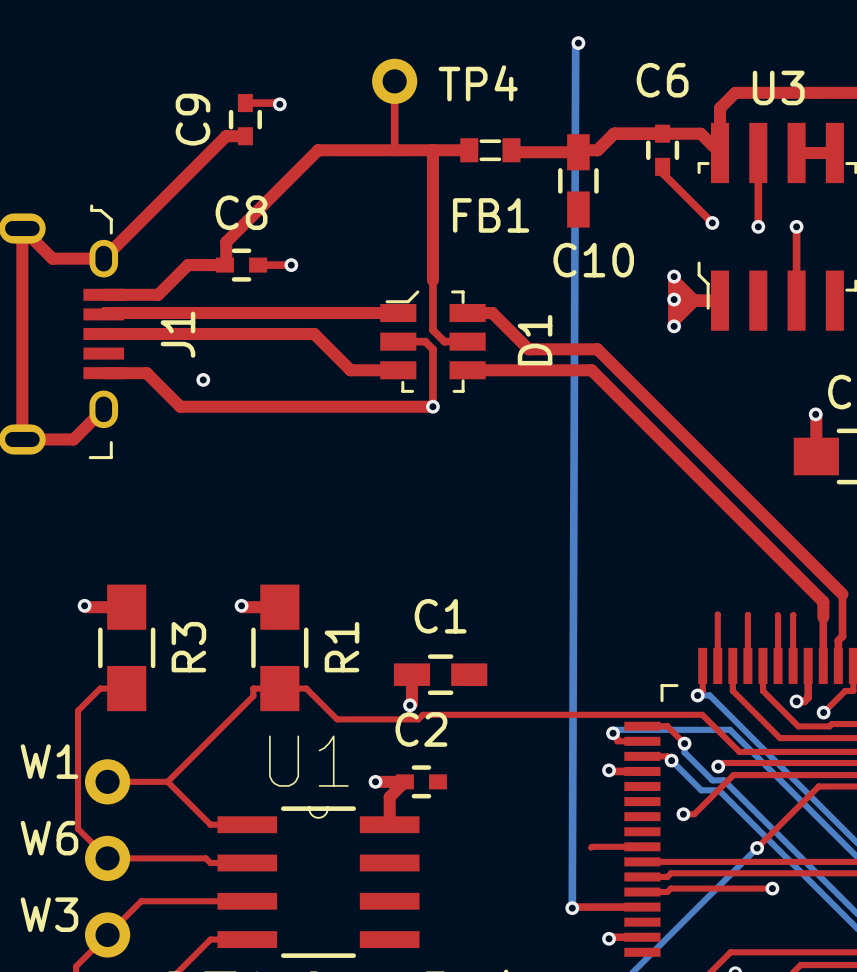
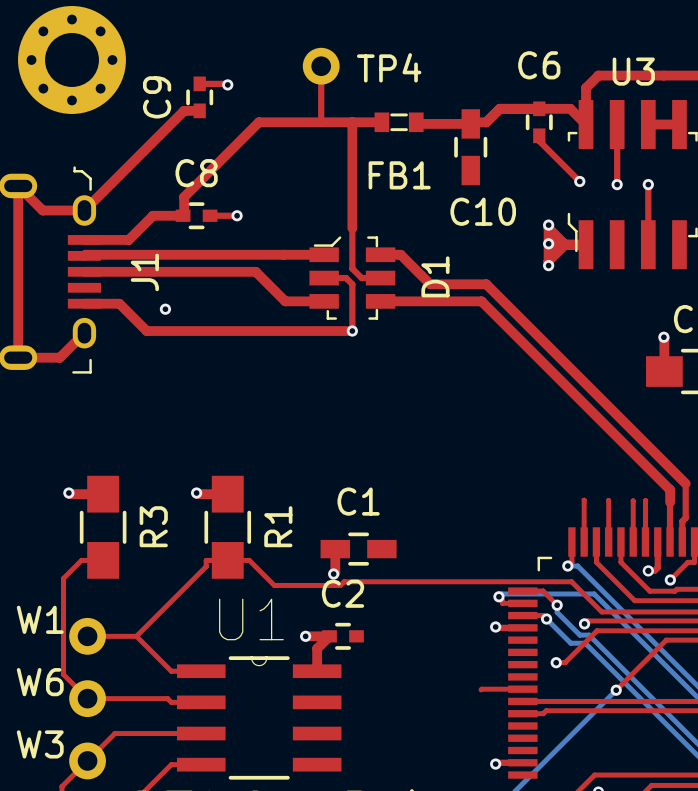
bottom track: (578, 43) (575, 45) (572, 908) -> none
via: (578, 43) -> none
part: none -> (71, 59)
top track: (772, 888) (670, 888) (667, 892) (642, 892) -> none
via: (772, 888) -> none
top track: (642, 907) (572, 908) -> none
via: (572, 908) -> none

